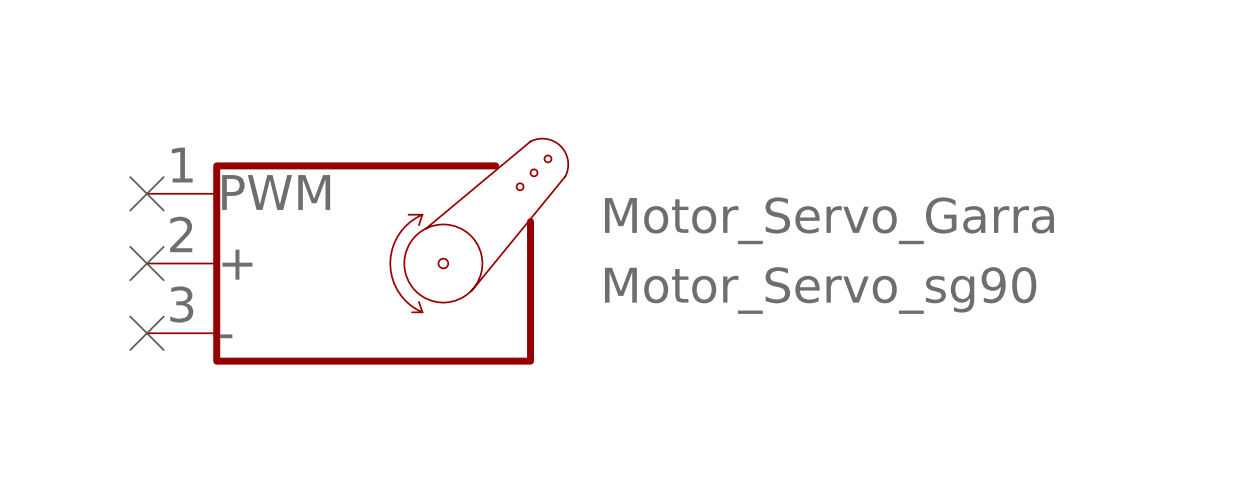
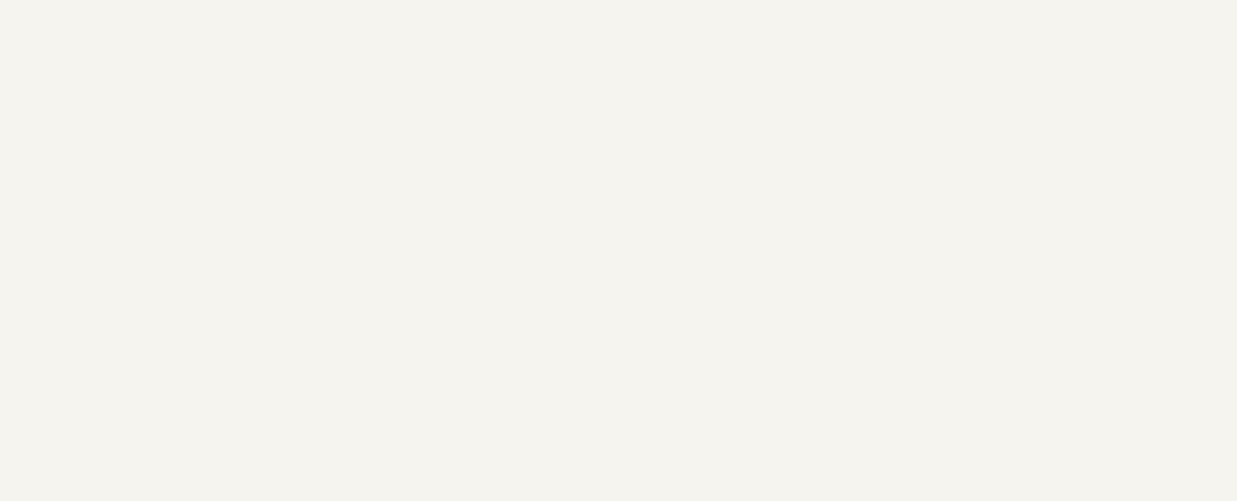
no-connect mark: (146, 193) -> none
Motor_Servo_Garra: Motor_Servo_sg90 (357, 251) -> none
no-connect mark: (146, 263) -> none
no-connect mark: (146, 333) -> none

